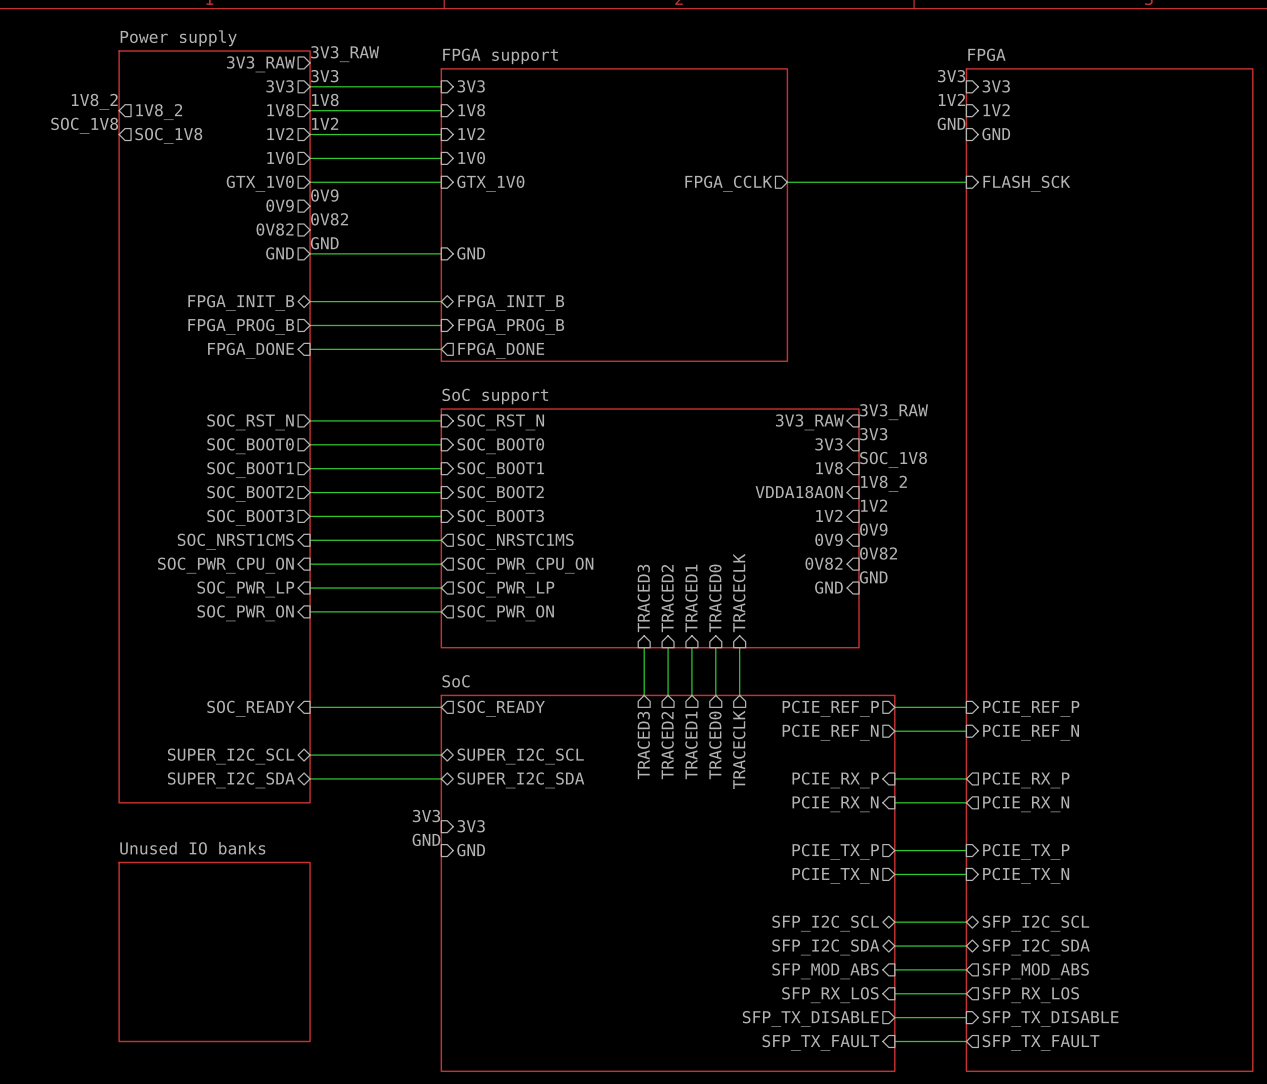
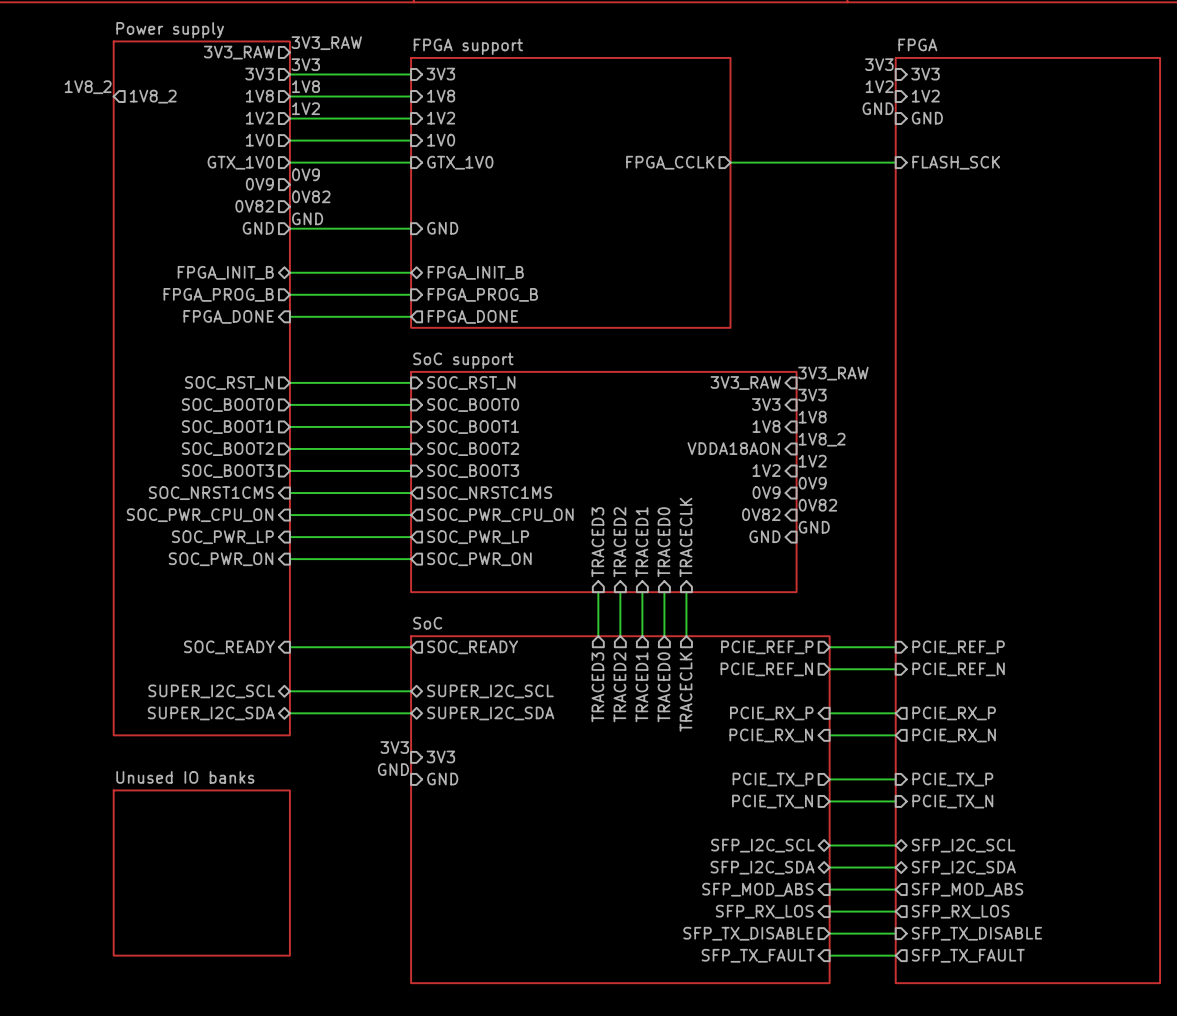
label: SOC_1V8 (84, 125) -> none
sheet pin: SOC_1V8 (168, 135) -> none
label: SOC_1V8 (893, 459) -> 1V8 (812, 417)

